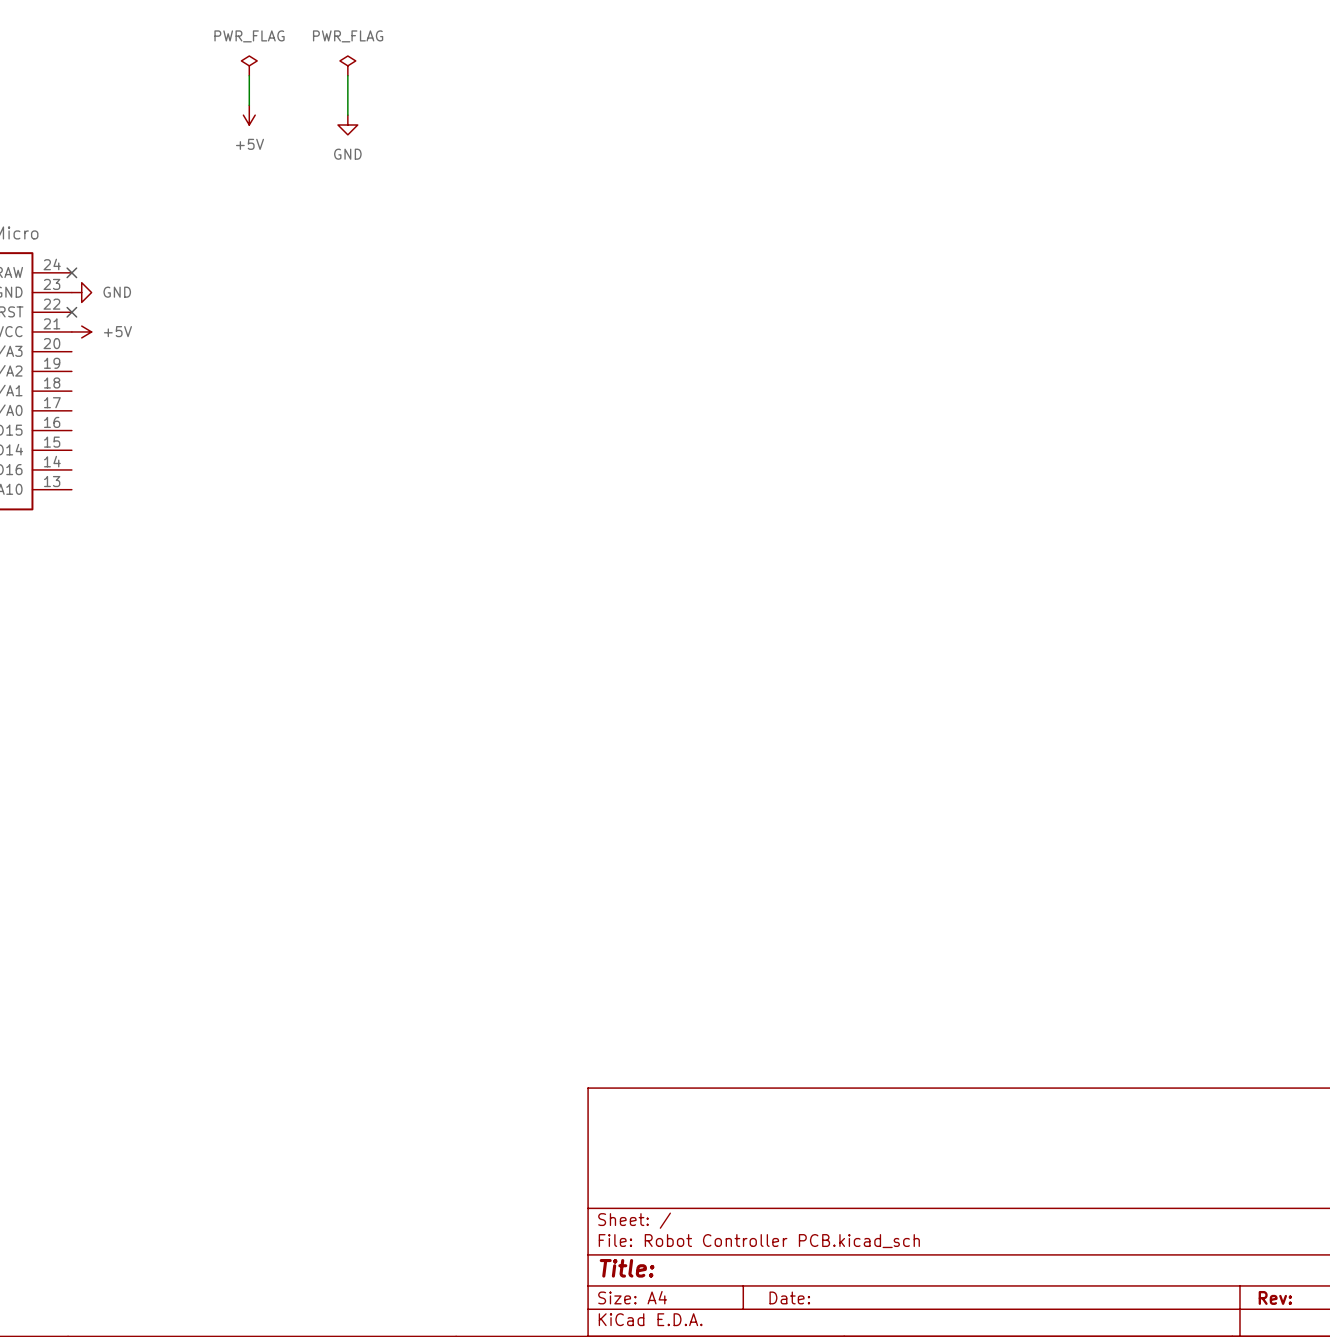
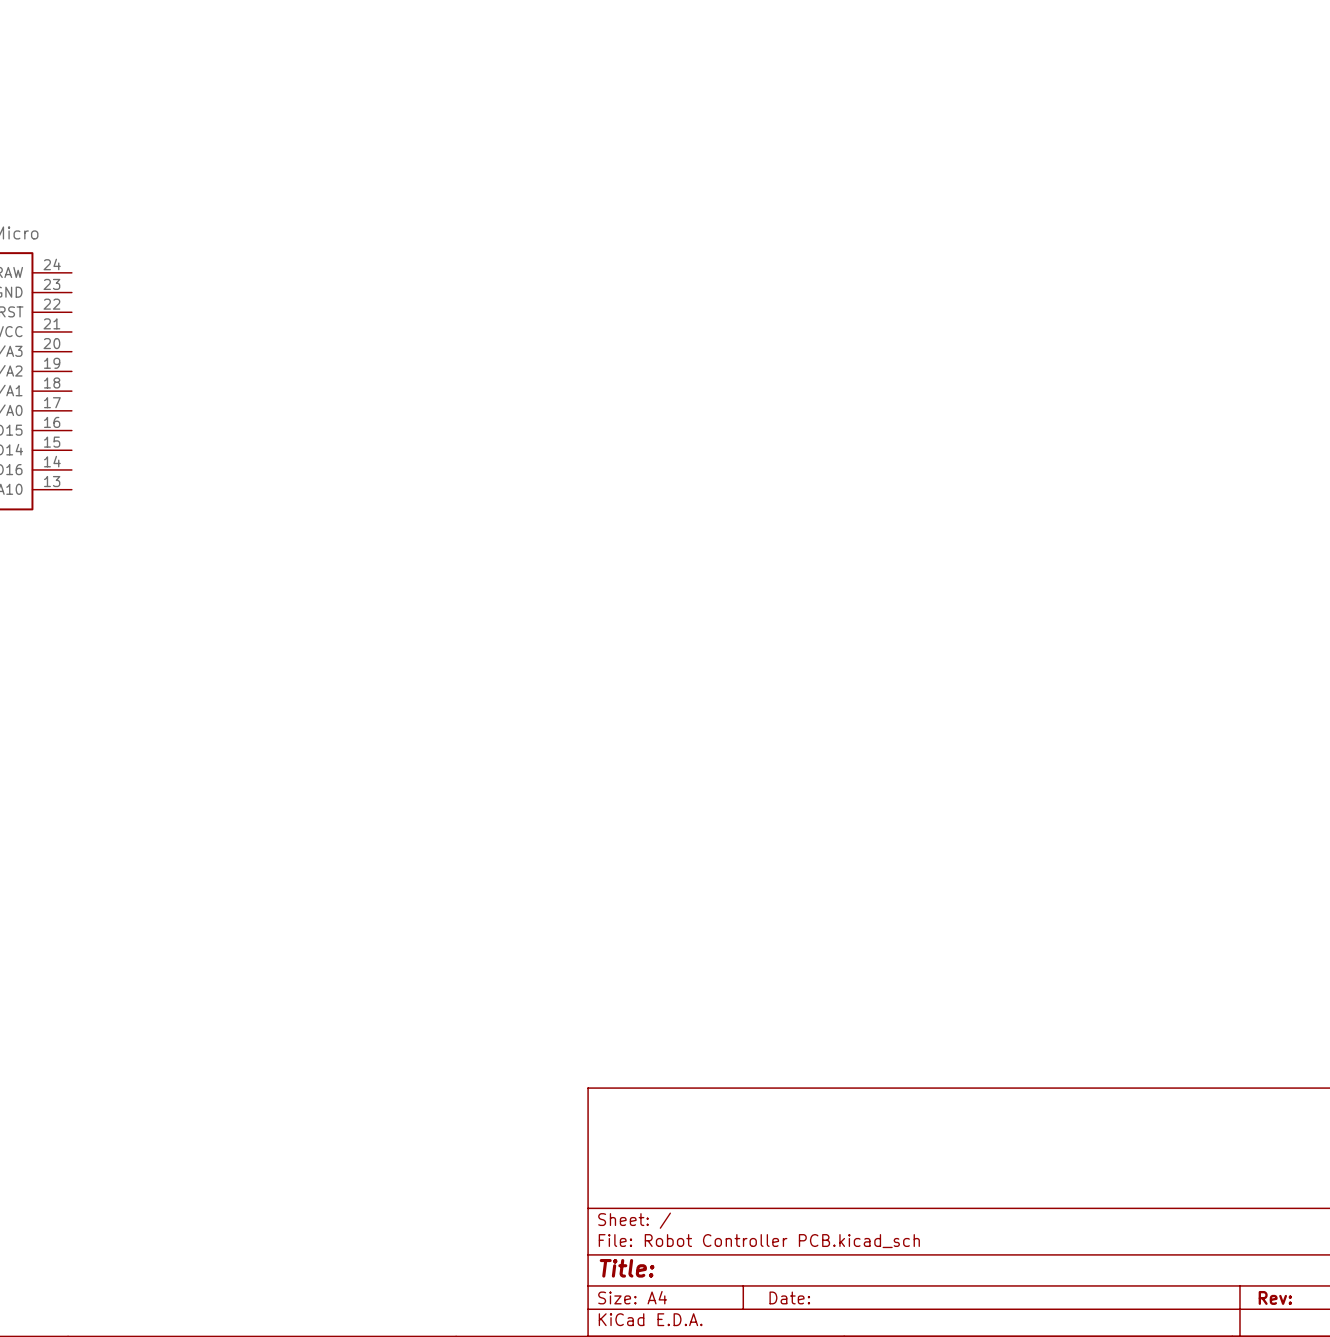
power symbol: PWR_FLAG (249, 65) -> none
power symbol: PWR_FLAG (347, 65) -> none
wire: (249, 75) (249, 105) -> none
wire: (347, 75) (347, 115) -> none
power symbol: +5V (249, 115) -> none
power symbol: GND (347, 125) -> none
no-connect mark: (71, 272) -> none
power symbol: GND (81, 292) -> none
no-connect mark: (71, 312) -> none
power symbol: +5V (81, 331) -> none

